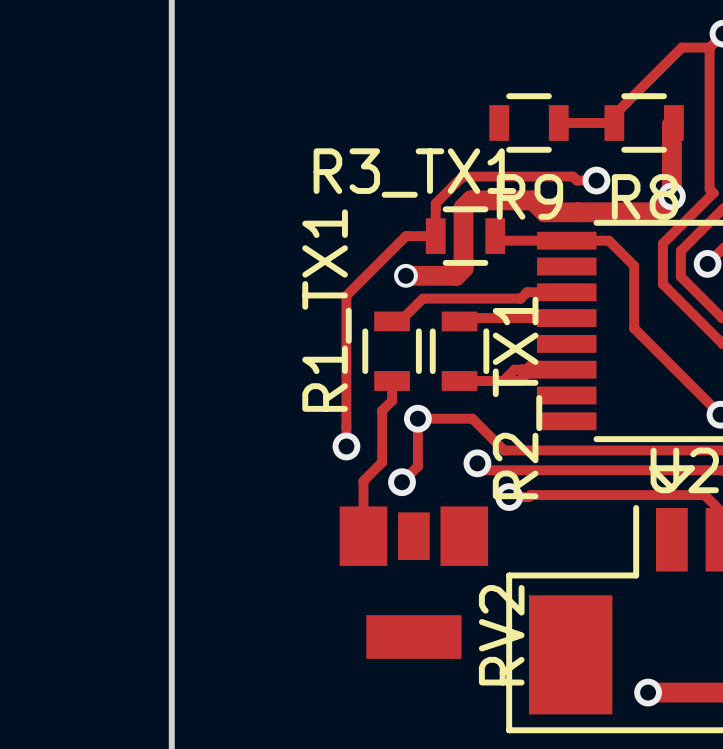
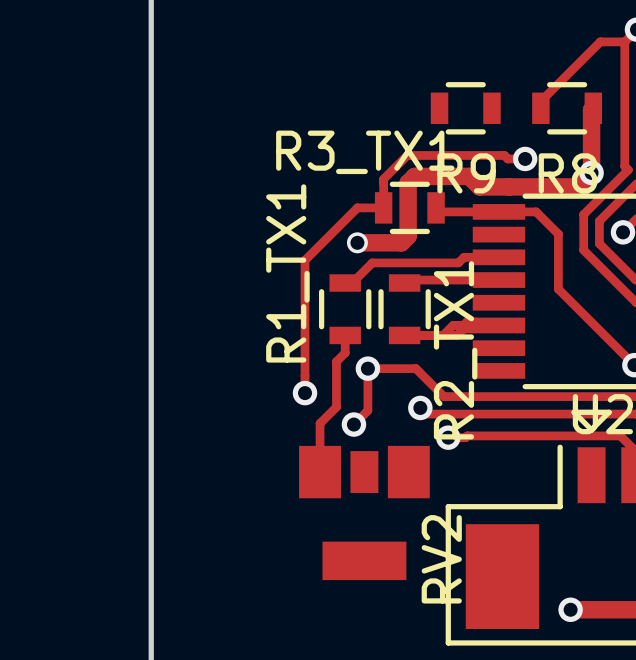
track: (558, 122) (614, 122) -> none

